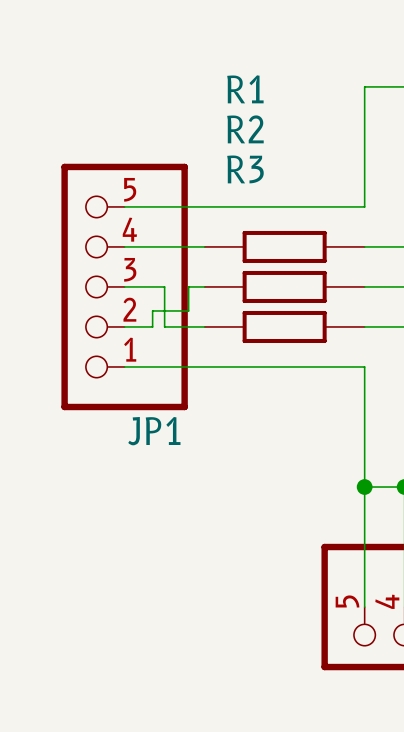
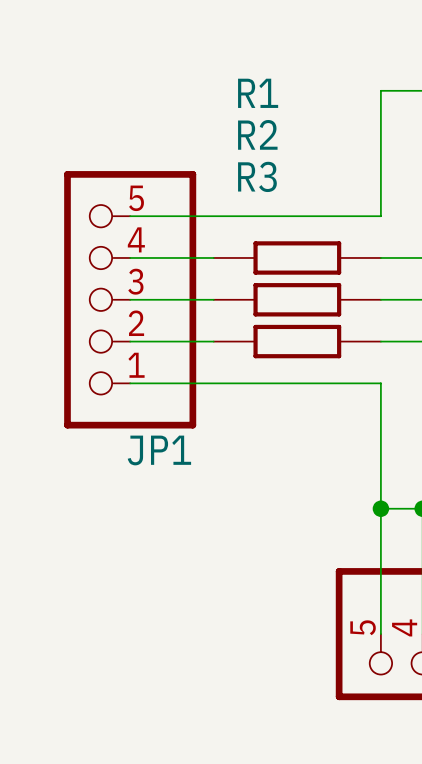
wire: (164, 286) (164, 326) -> (159, 341) (171, 341)
wire: (188, 286) (188, 310) (152, 310) (152, 326) -> (197, 299) (171, 299)

